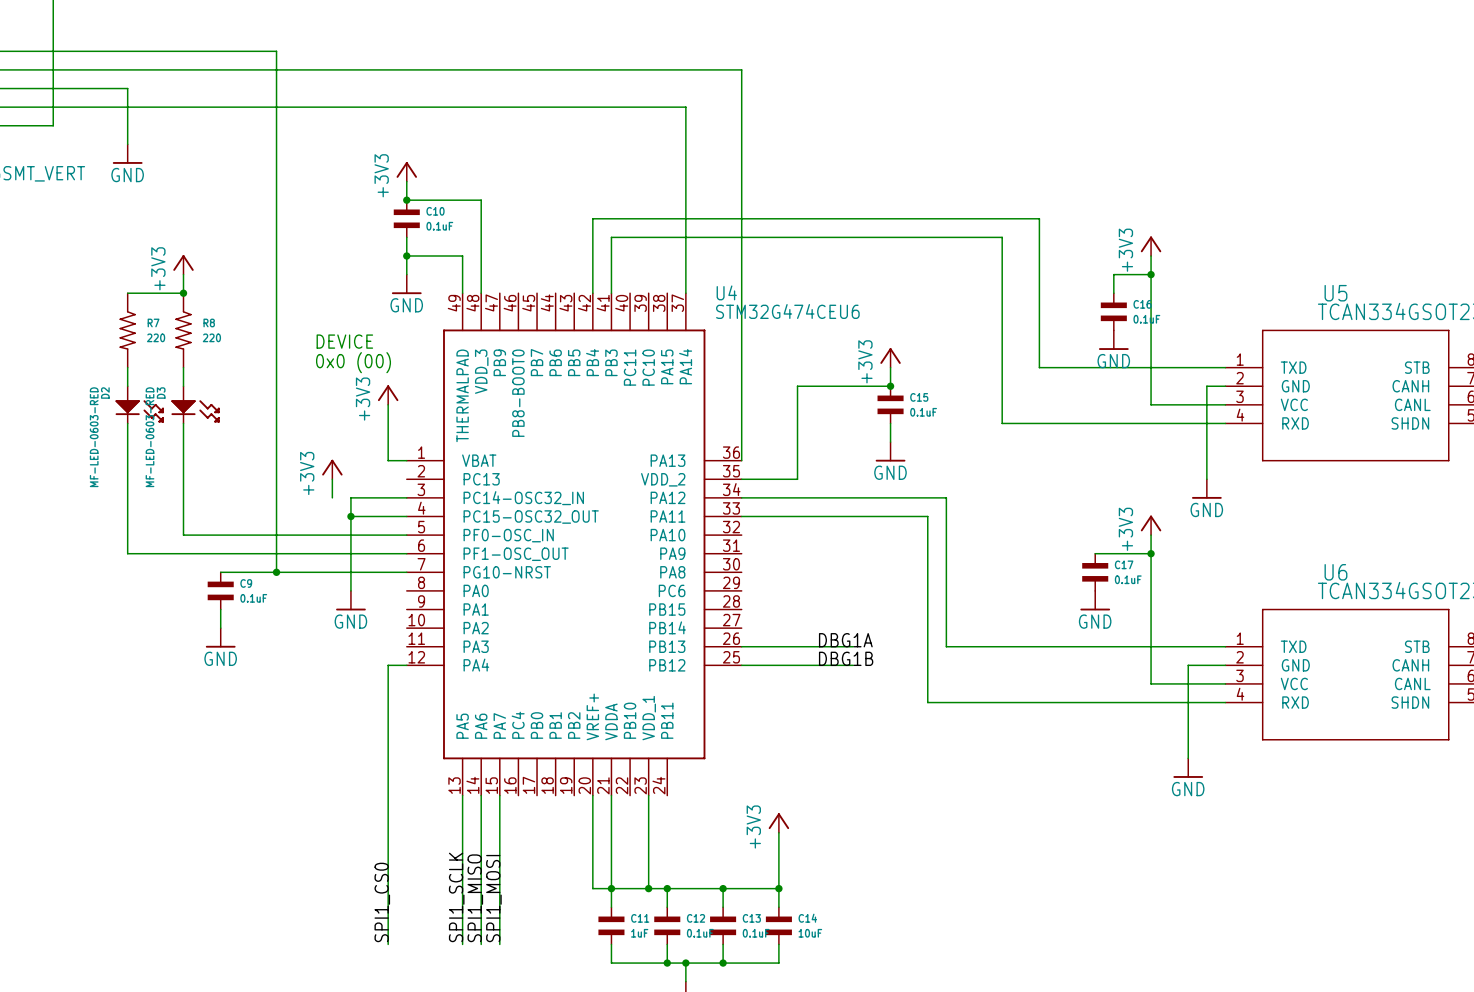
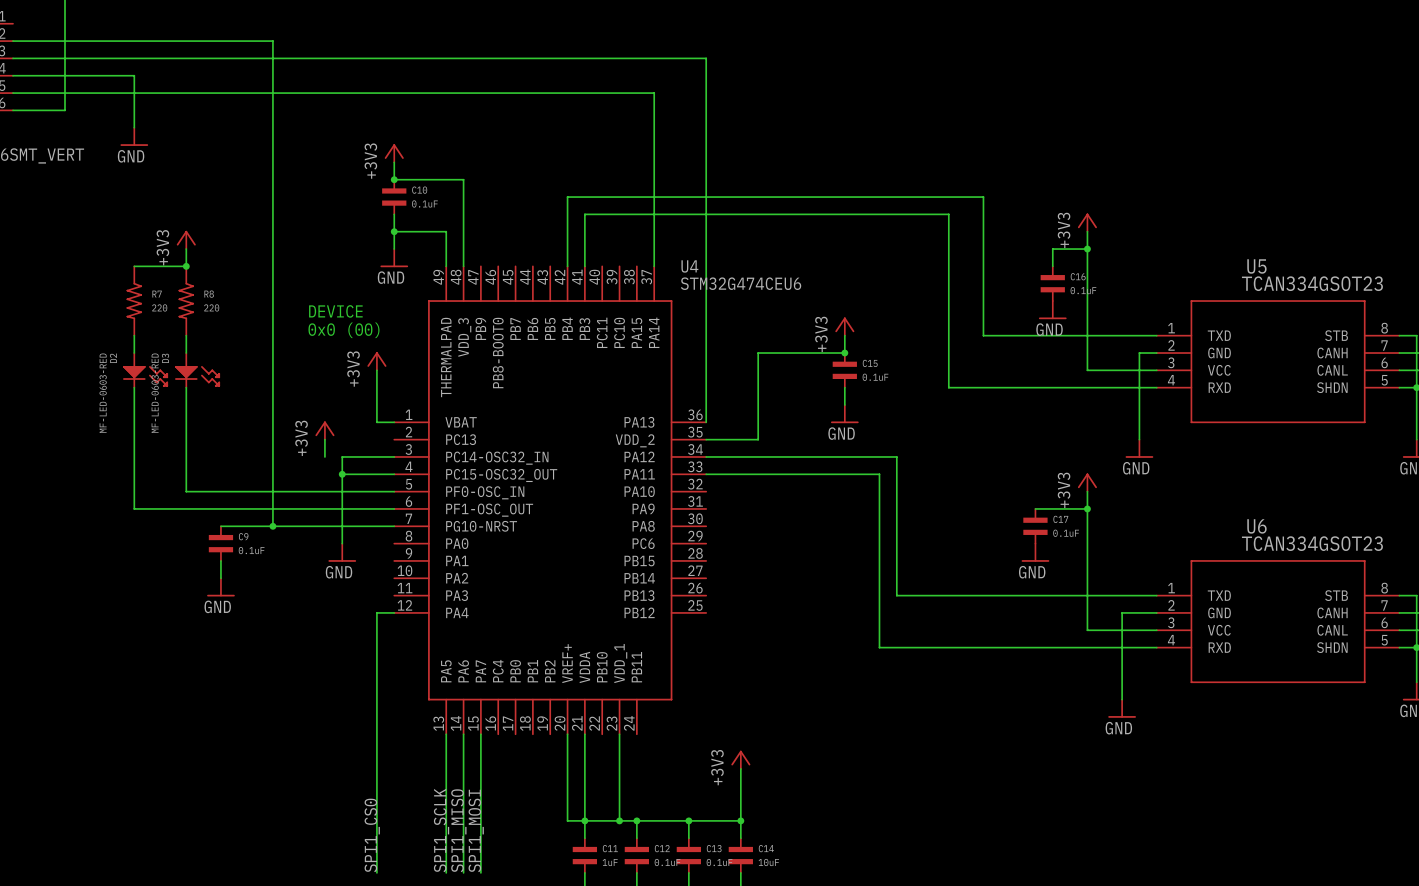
label: DBG1A (845, 640) -> none
wire: (741, 646) (853, 646) -> none
label: DBG1B (846, 658) -> none
wire: (741, 665) (853, 665) -> none

